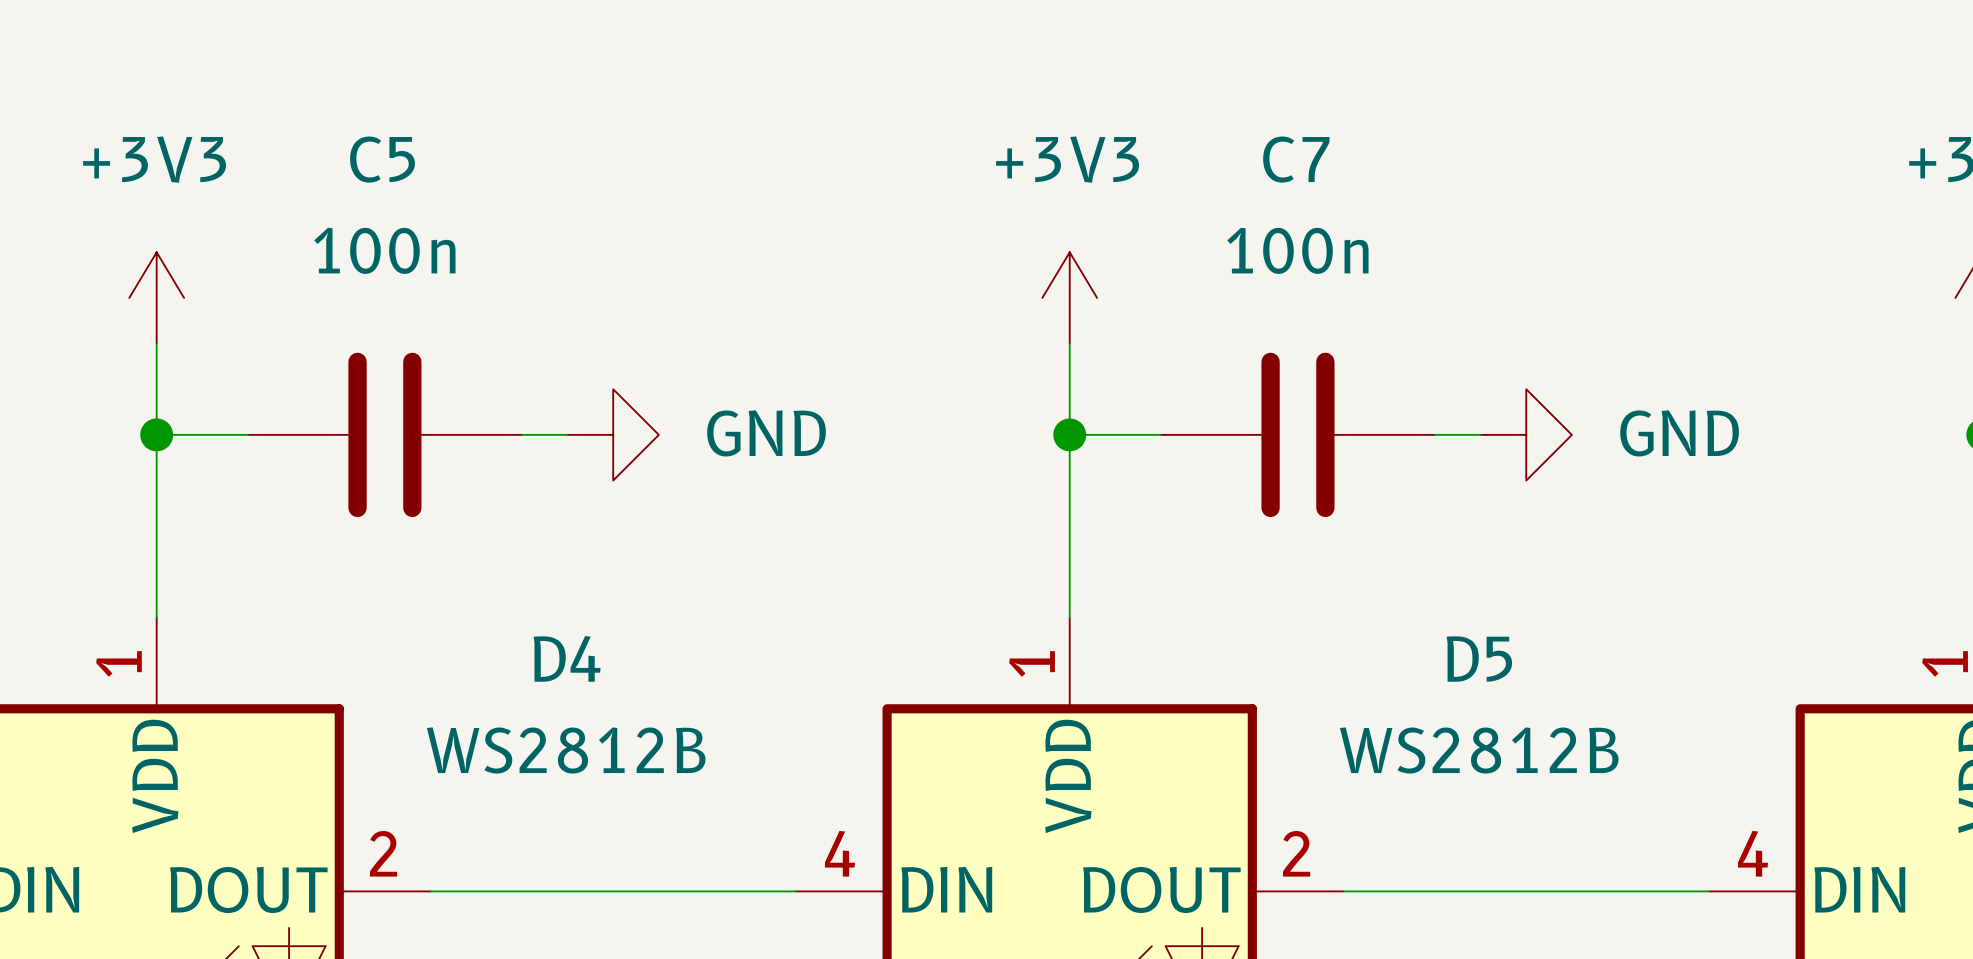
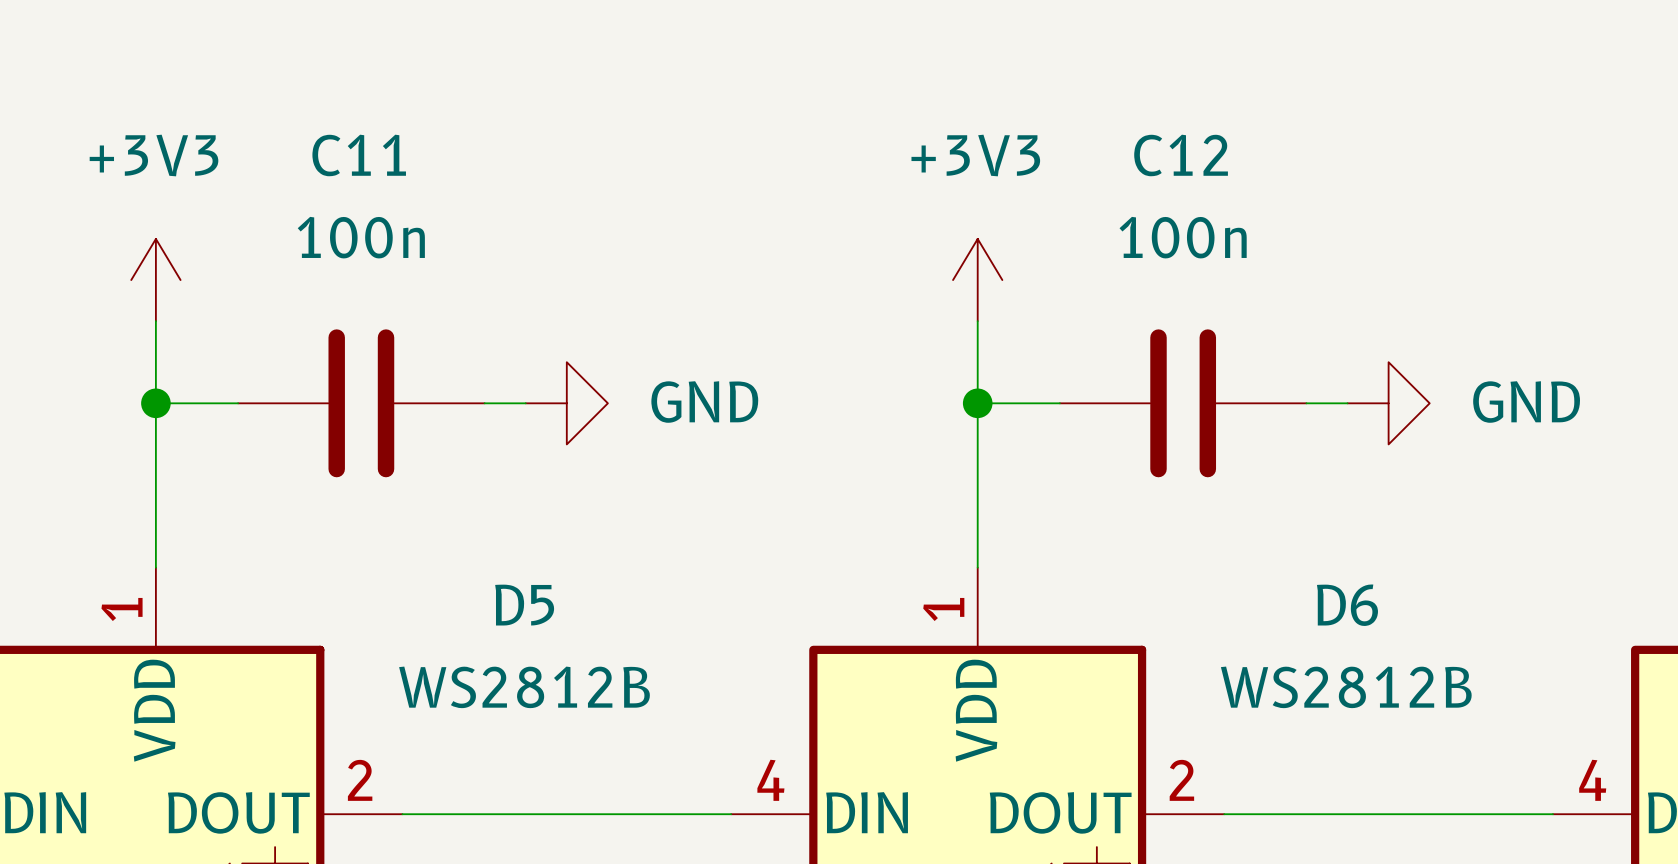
C5 name: C5 (382, 159) -> C11 (359, 155)
C7 name: C7 (1296, 159) -> C12 (1181, 155)
D4 name: D4 (567, 658) -> D5 (524, 605)
D5 name: D5 (1479, 659) -> D6 (1347, 605)

